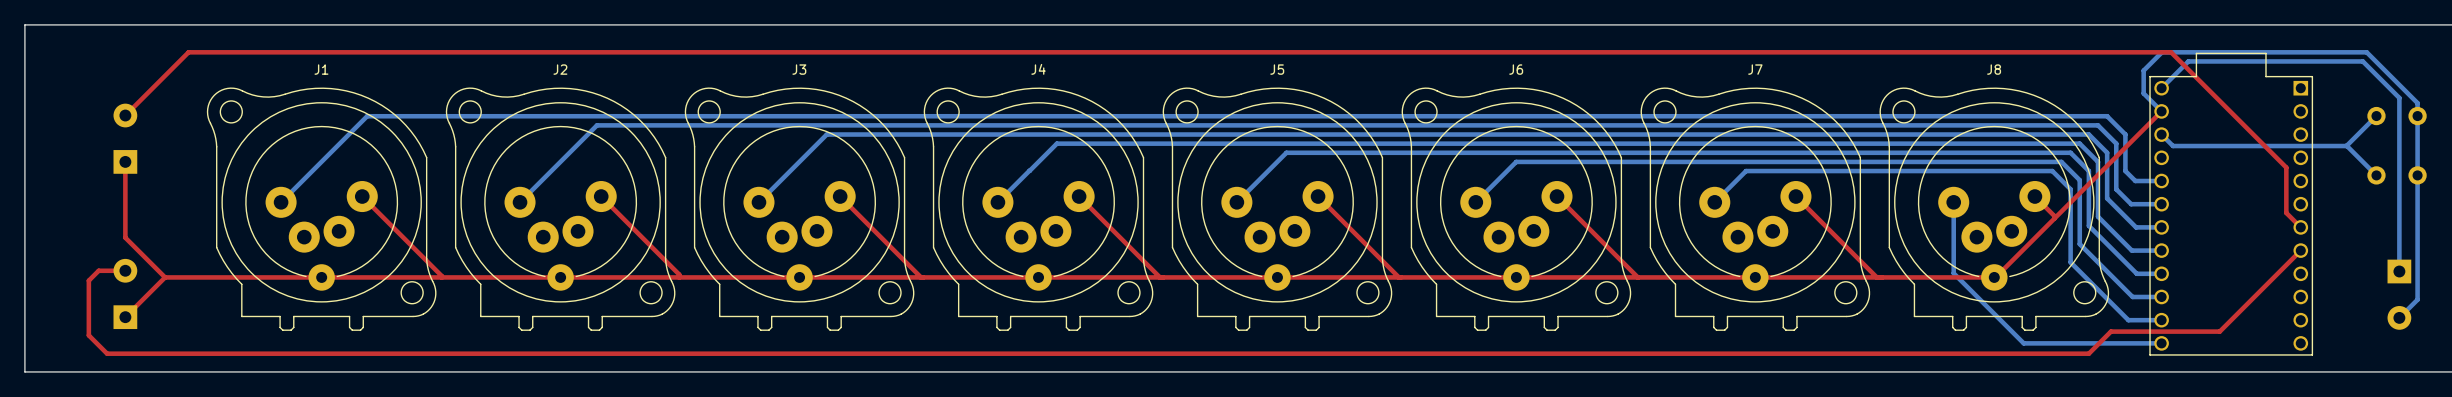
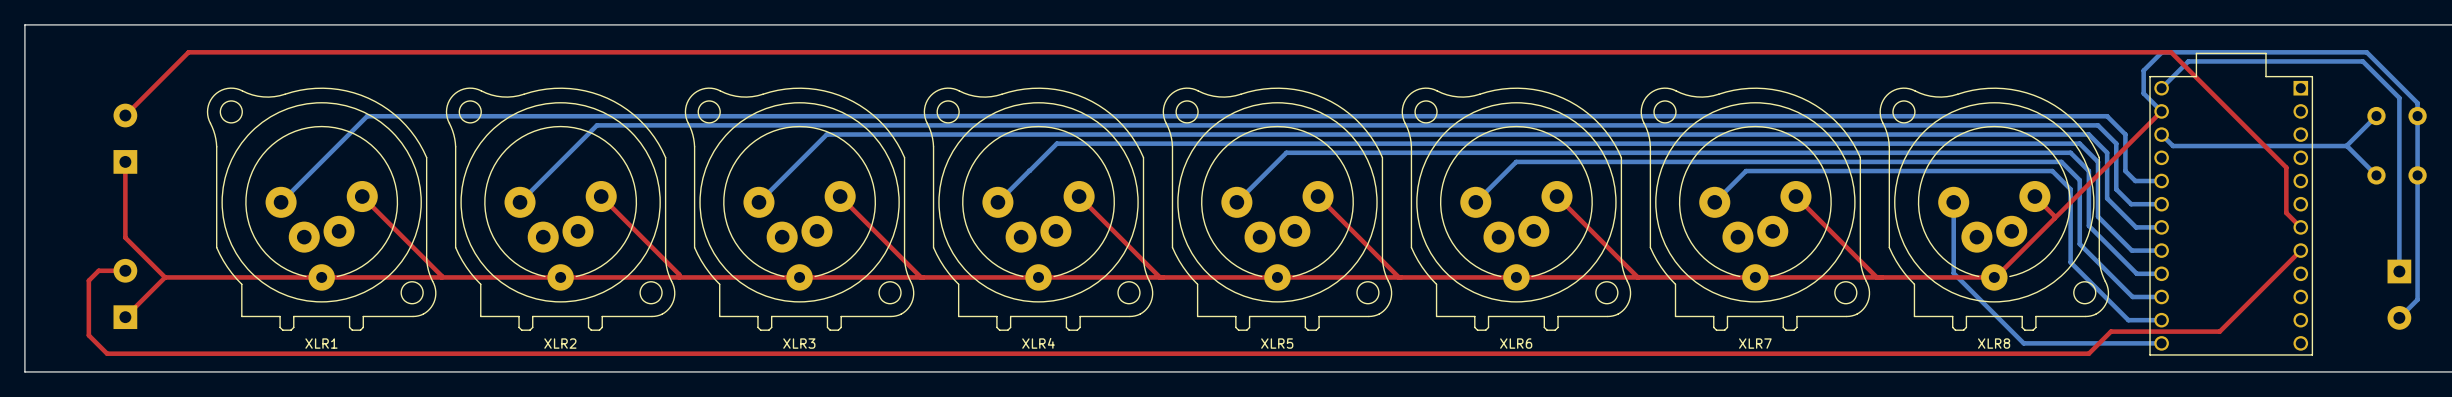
J1 name: J1 (321, 69) -> none
J2 name: J2 (560, 69) -> none
J3 name: J3 (799, 69) -> none
J4 name: J4 (1038, 69) -> none
J5 name: J5 (1277, 69) -> none
J6 name: J6 (1516, 69) -> none
J7 name: J7 (1755, 69) -> none
J8 name: J8 (1994, 69) -> none
J1 value: none -> XLR1 (321, 343)
J2 value: none -> XLR2 (560, 343)
J3 value: none -> XLR3 (799, 343)
J4 value: none -> XLR4 (1038, 343)
J5 value: none -> XLR5 (1277, 343)
J6 value: none -> XLR6 (1516, 343)
J7 value: none -> XLR7 (1755, 343)
J8 value: none -> XLR8 (1994, 343)

